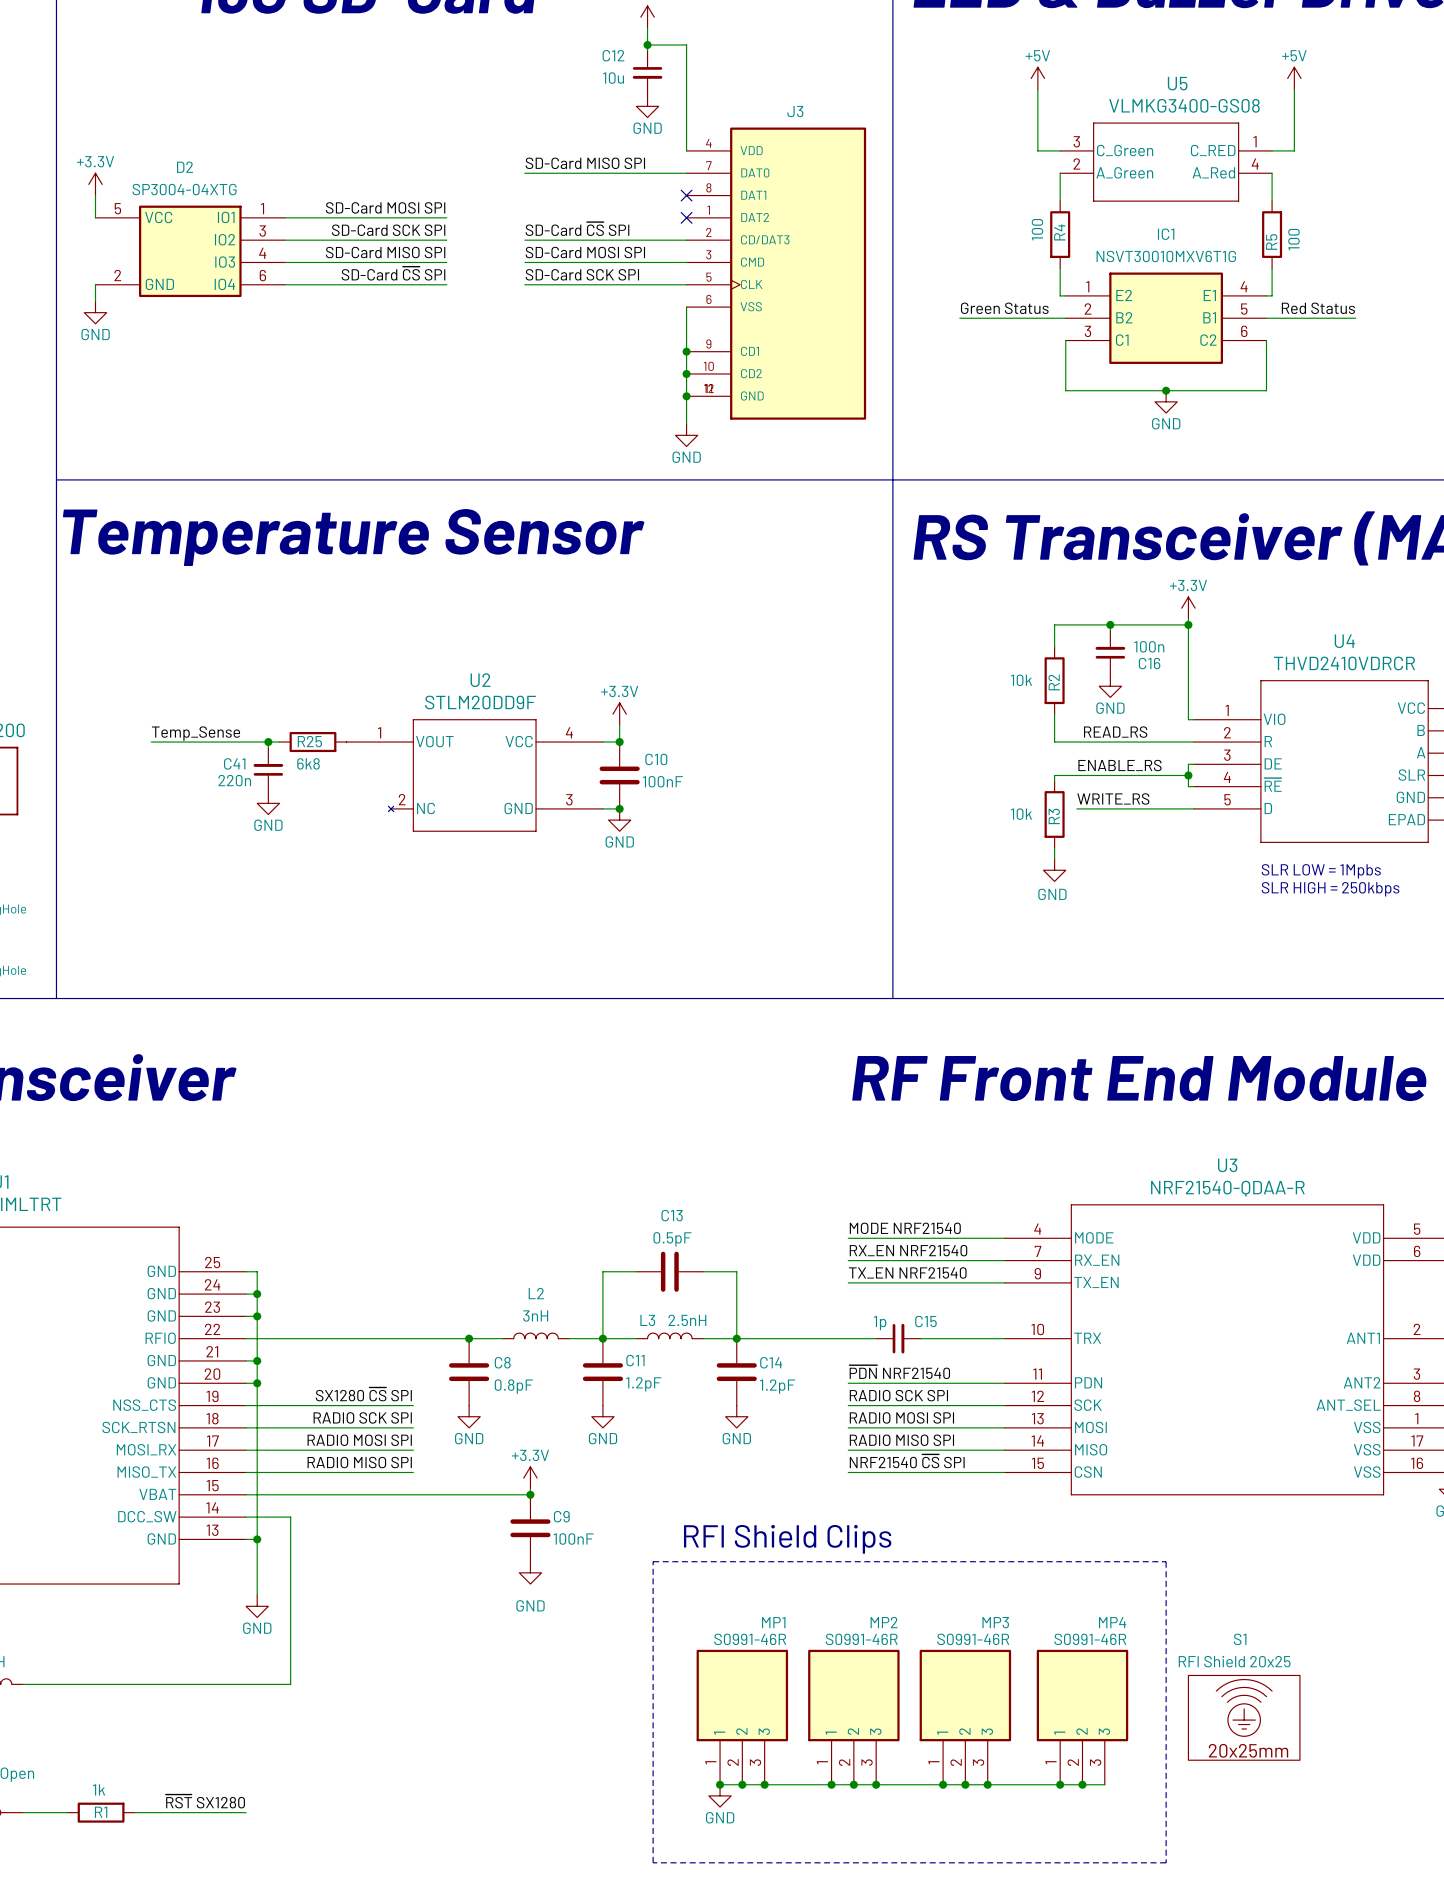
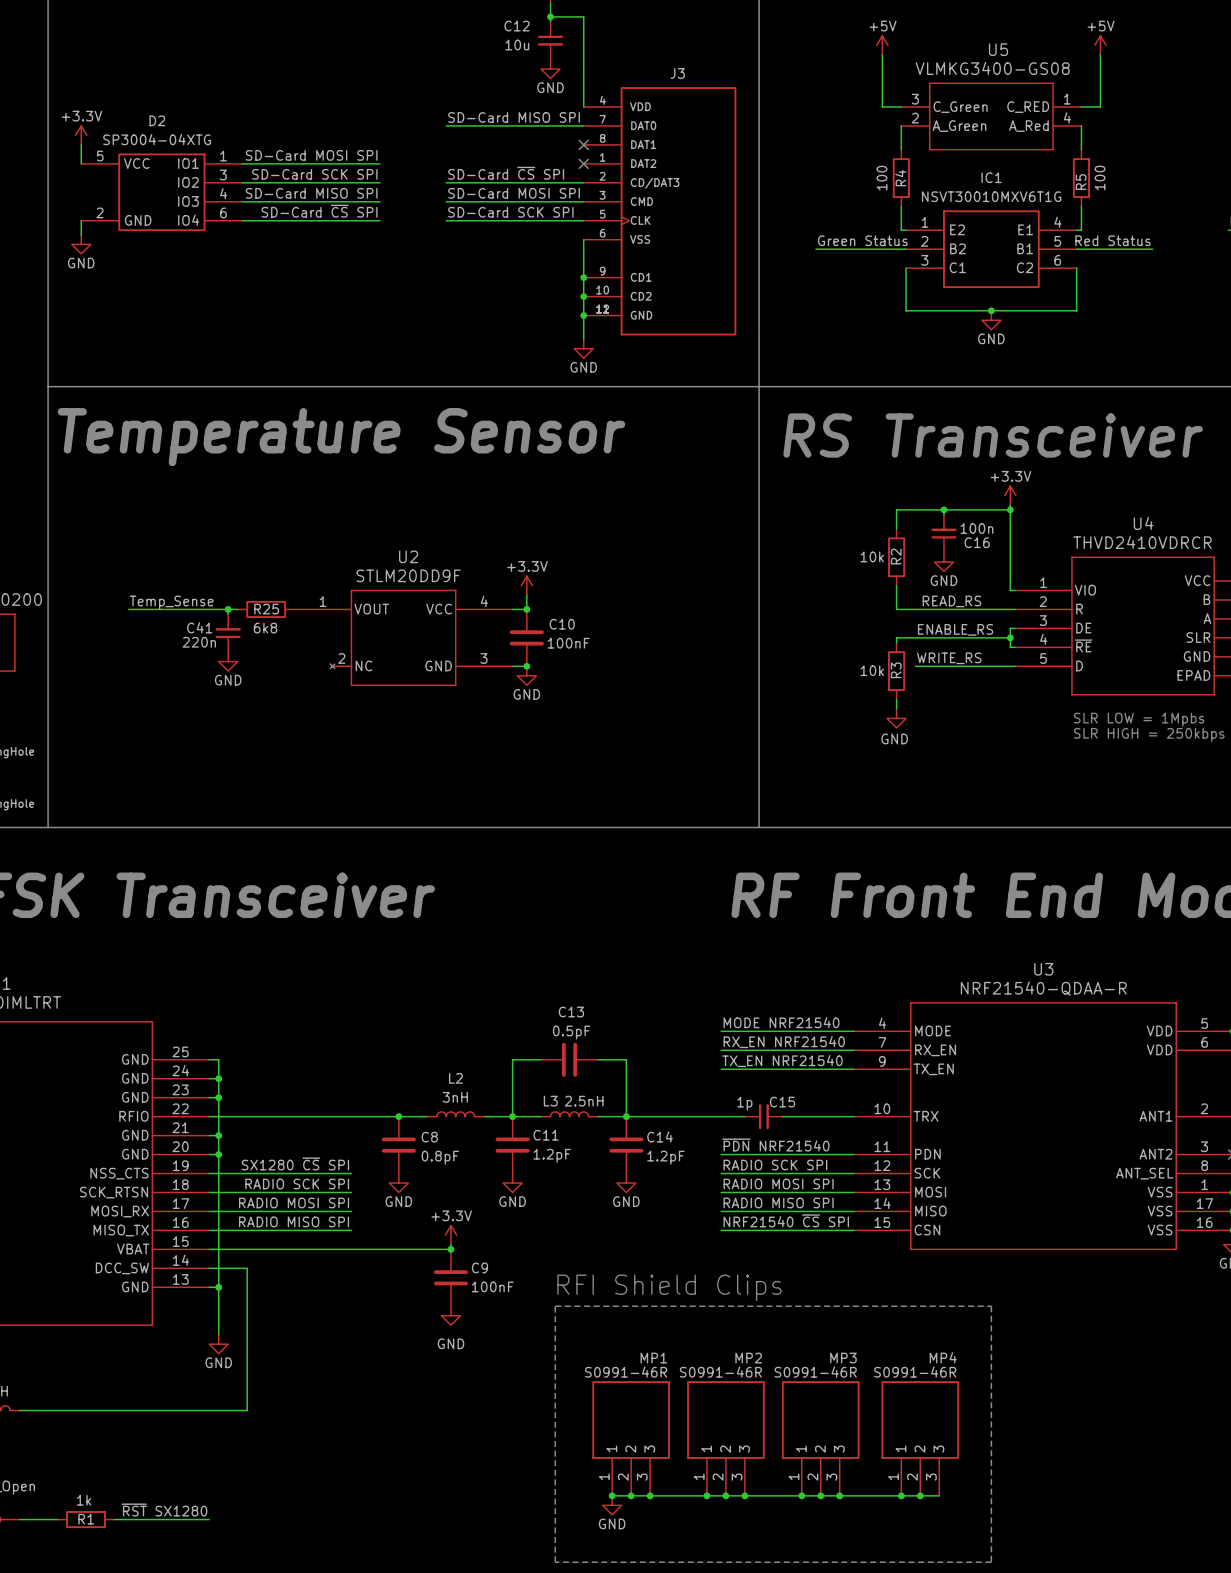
S1: RFI Shield 20x25 (1244, 1717) -> none

